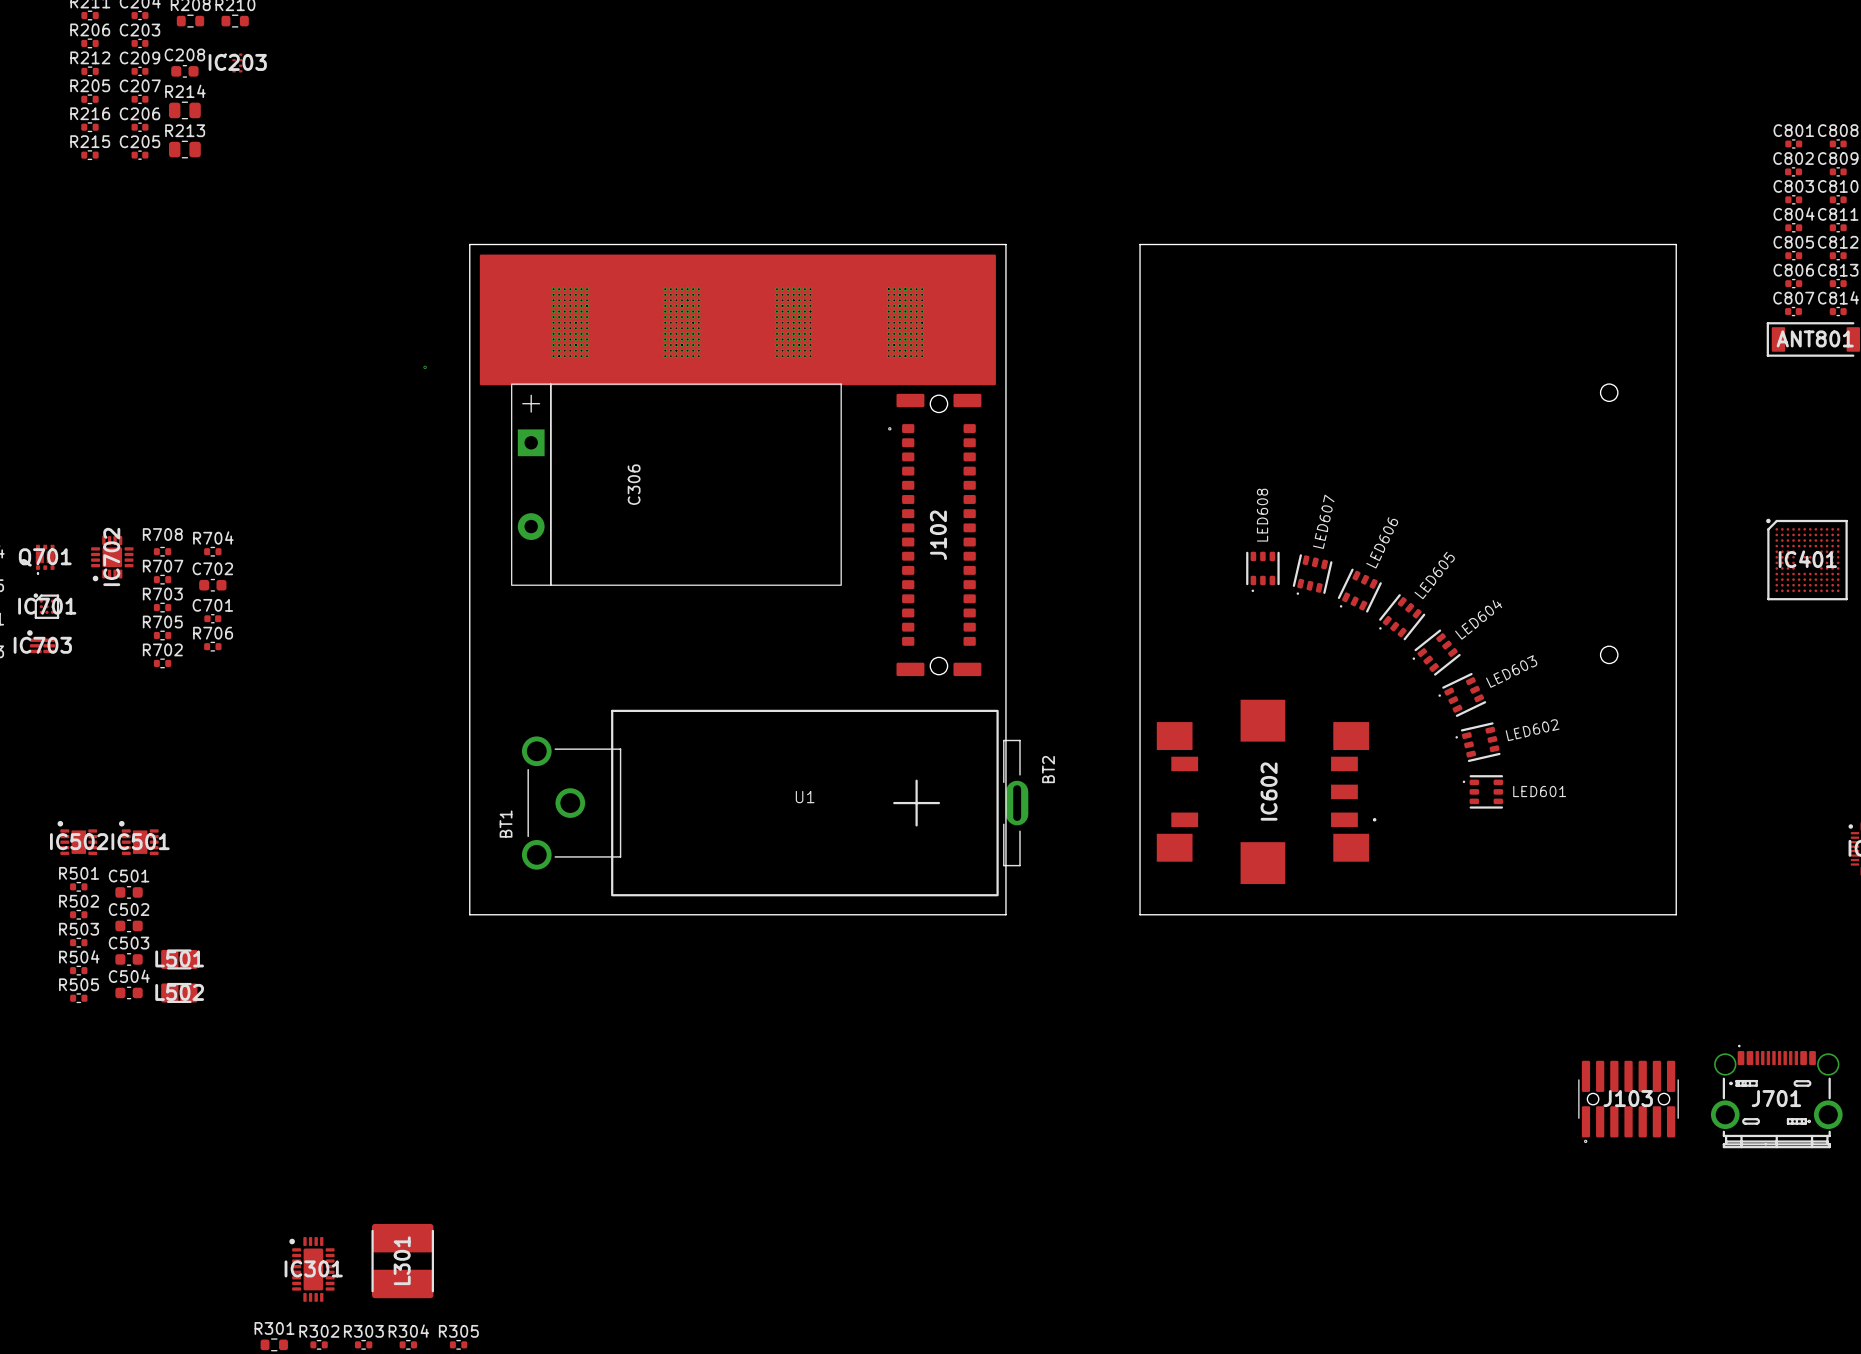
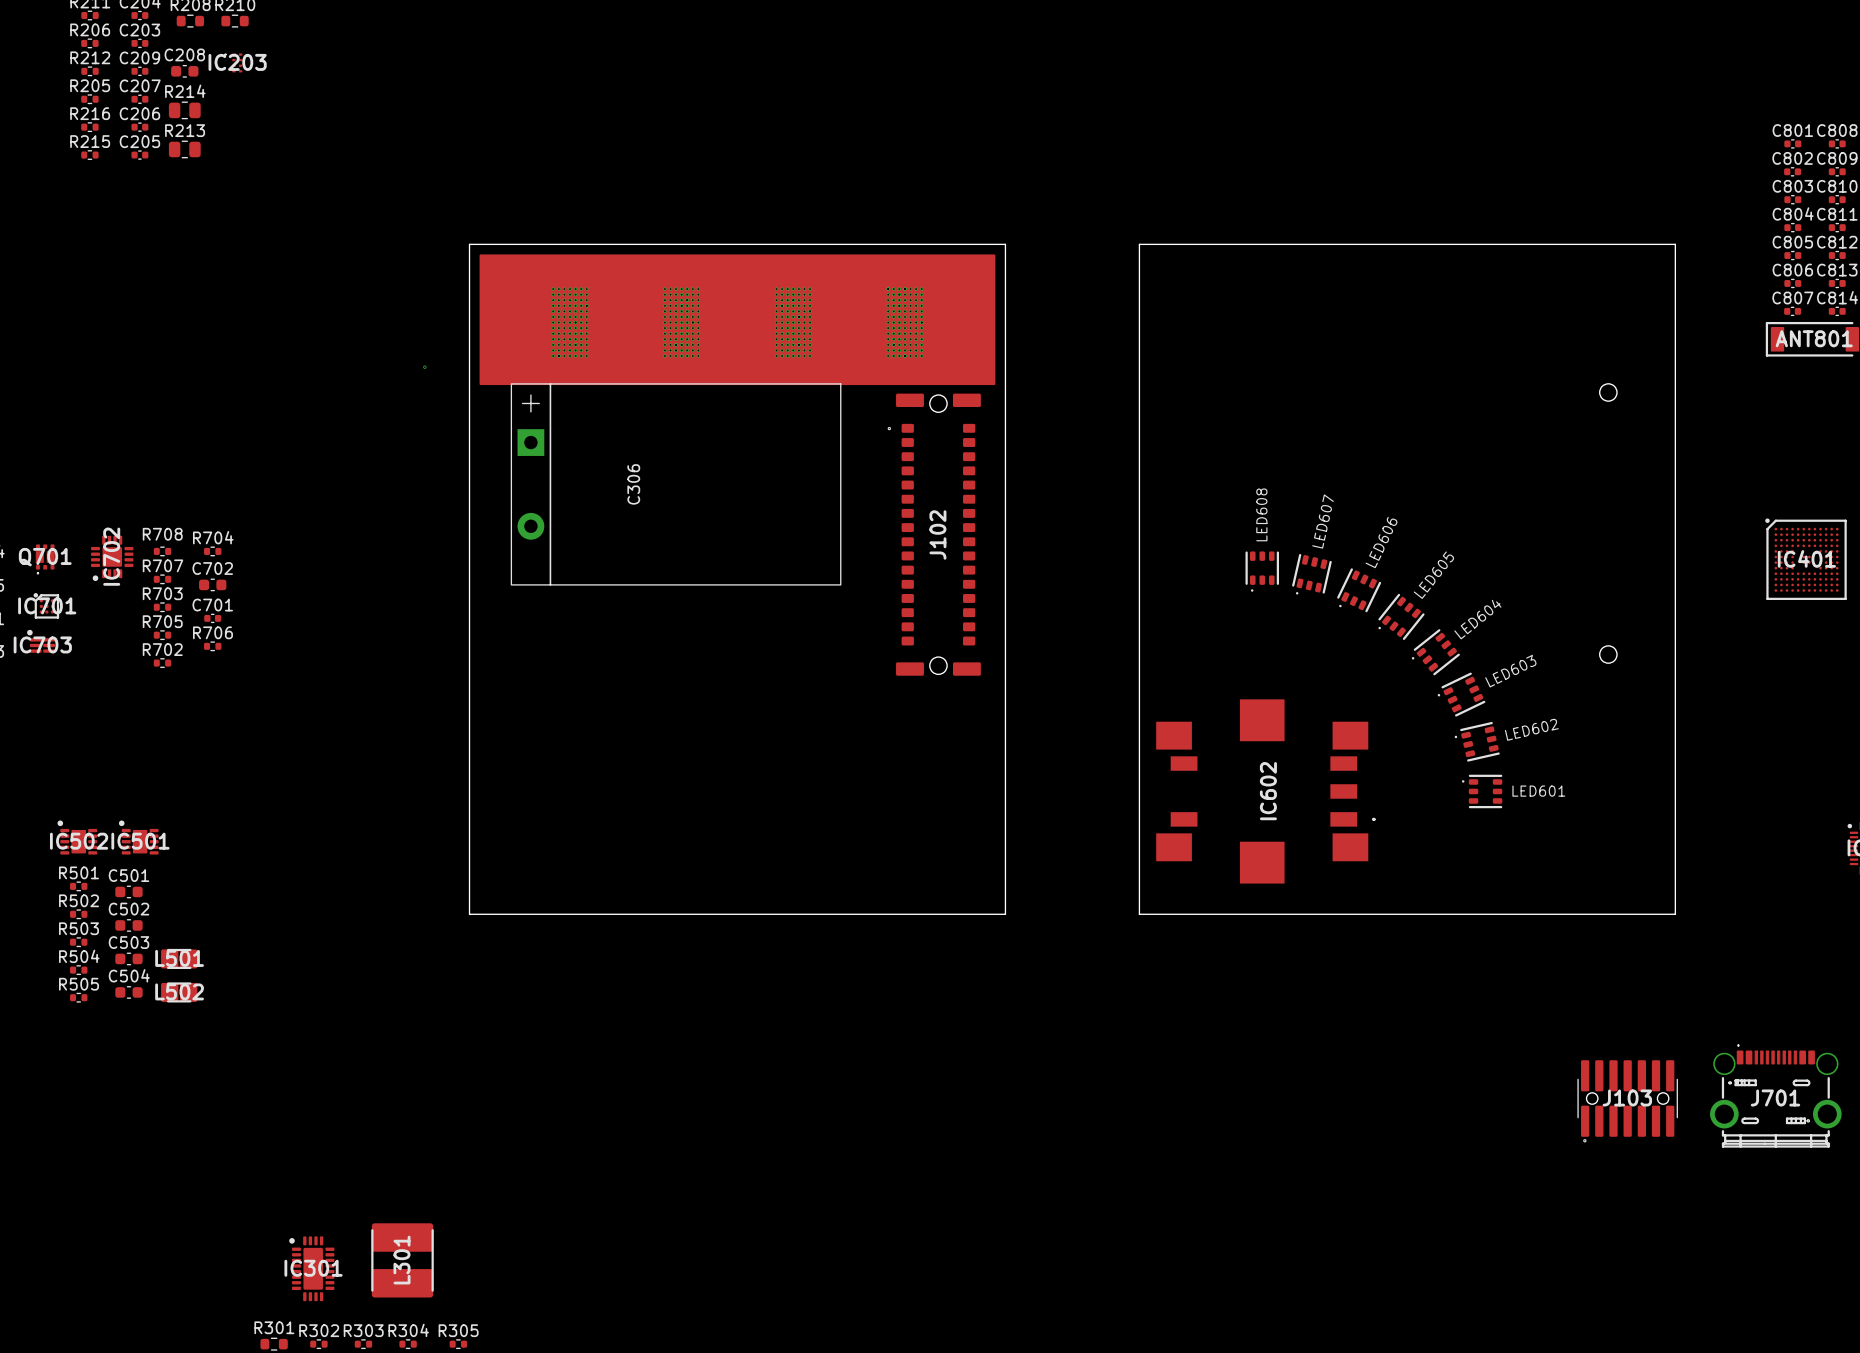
BT1: (571, 803) -> none
U1: (804, 803) -> none
BT2: (1015, 803) -> none

